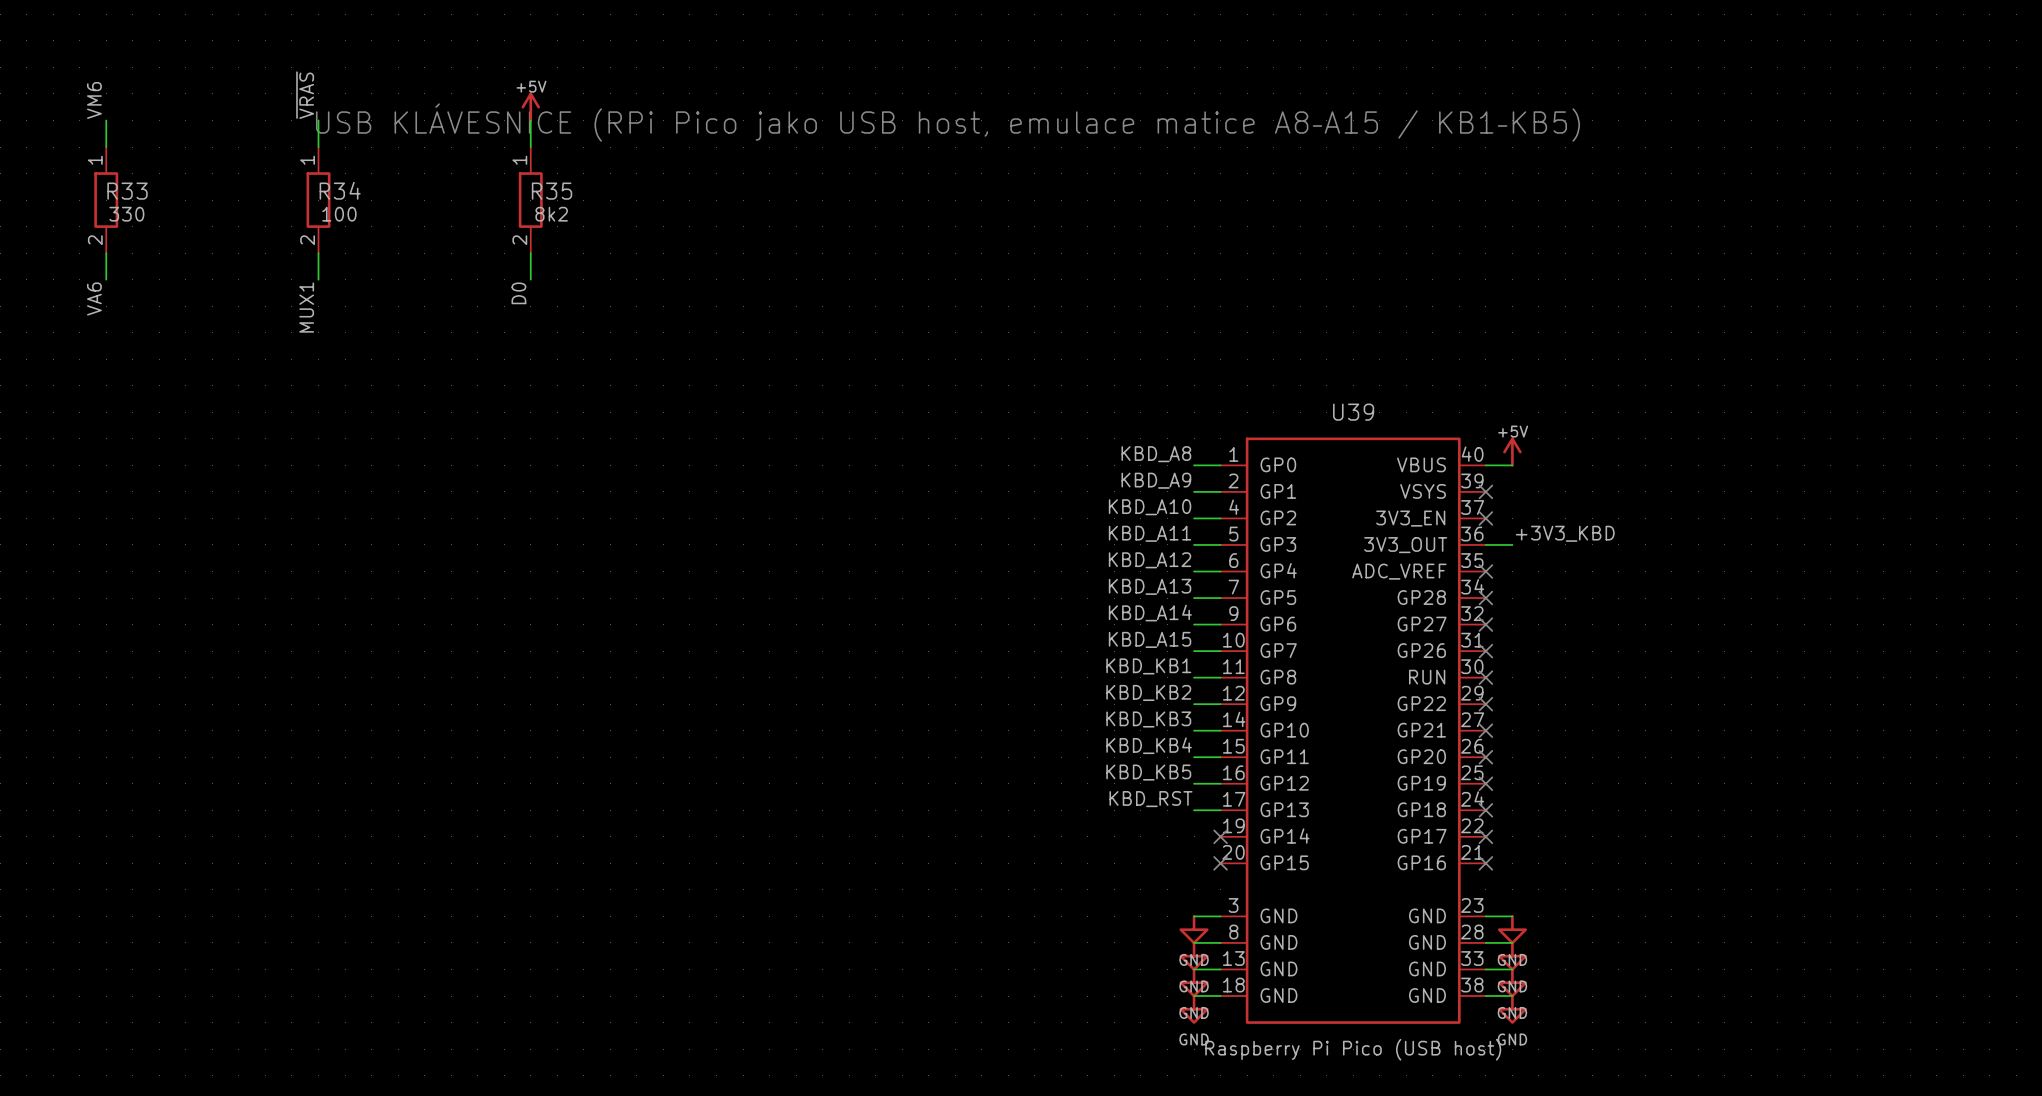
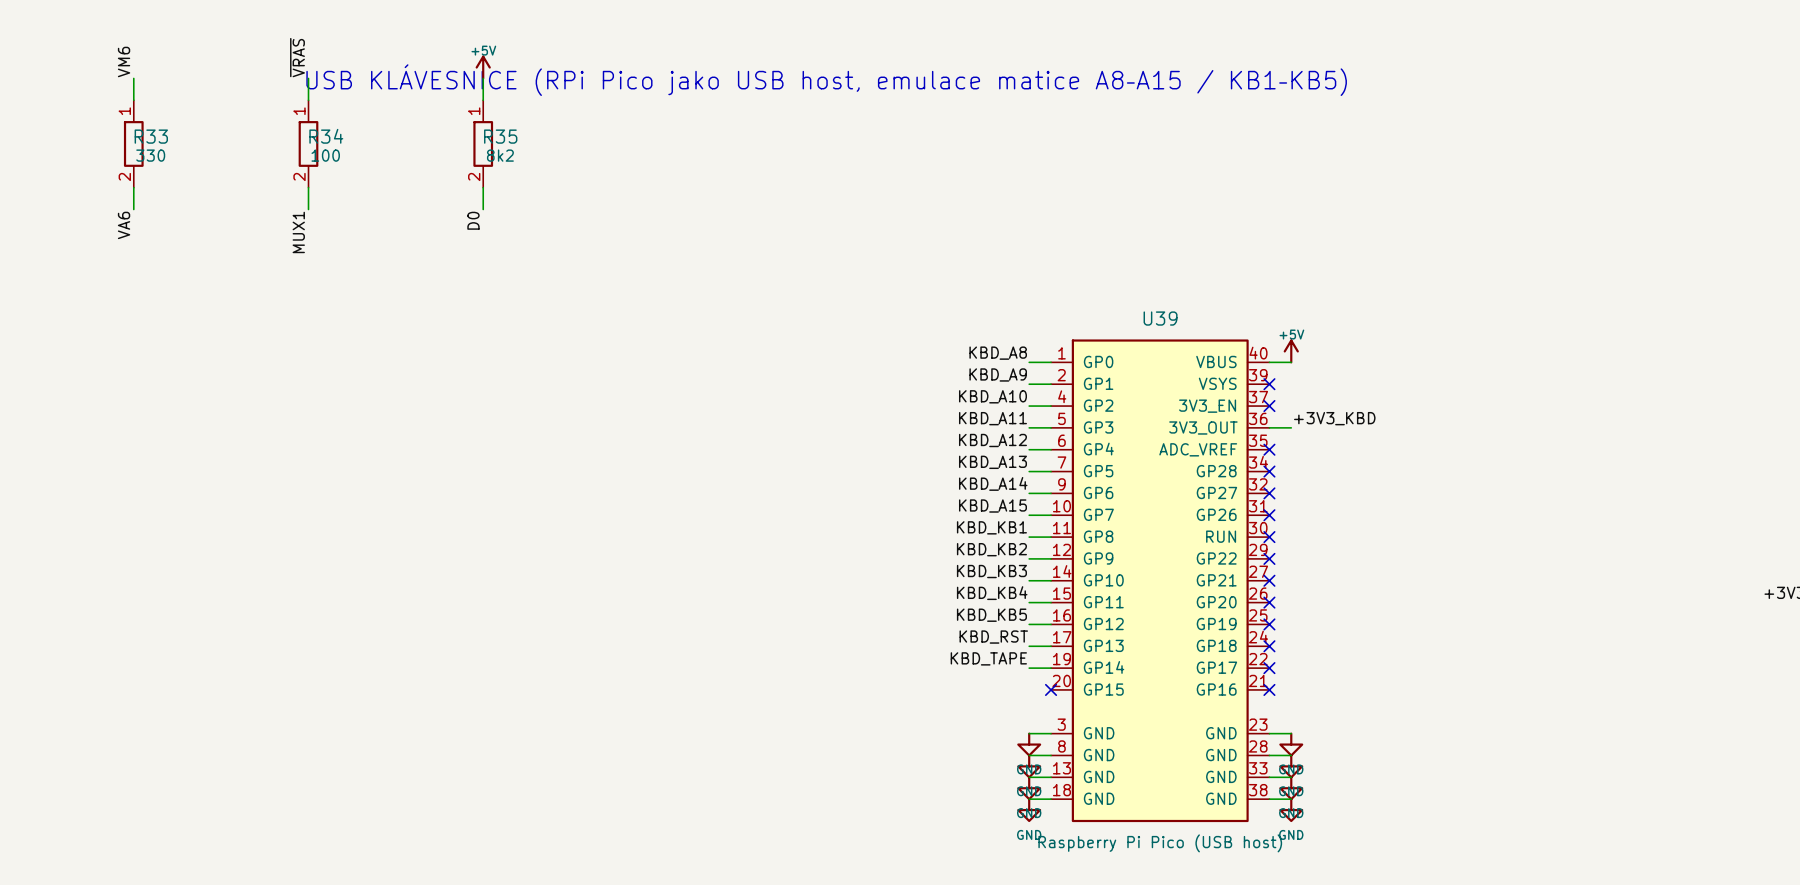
label: none -> KBD_TAPE (988, 658)
wire: none -> (1029, 668) (1051, 668)
no-connect mark: (1220, 836) -> none

